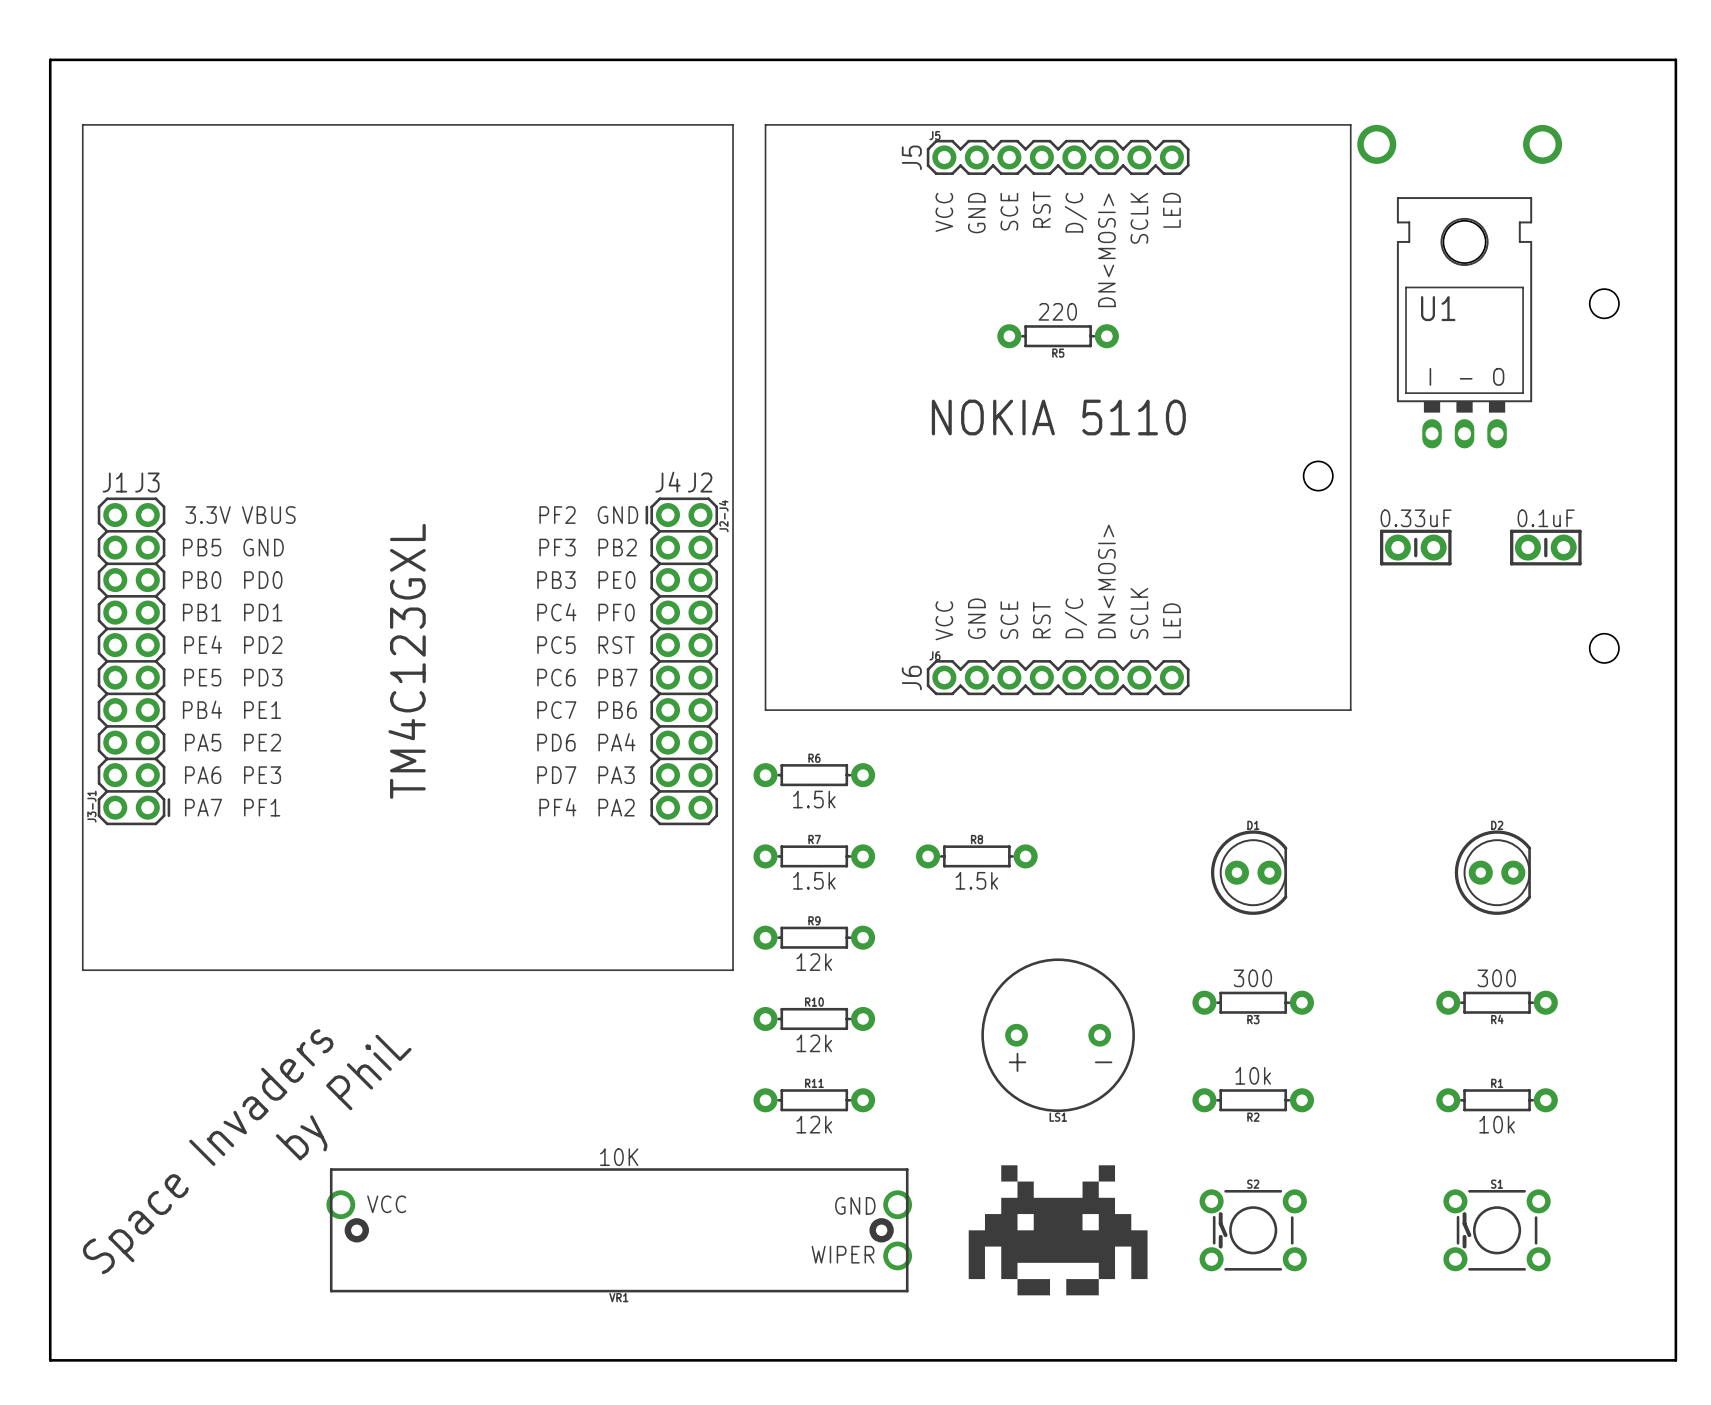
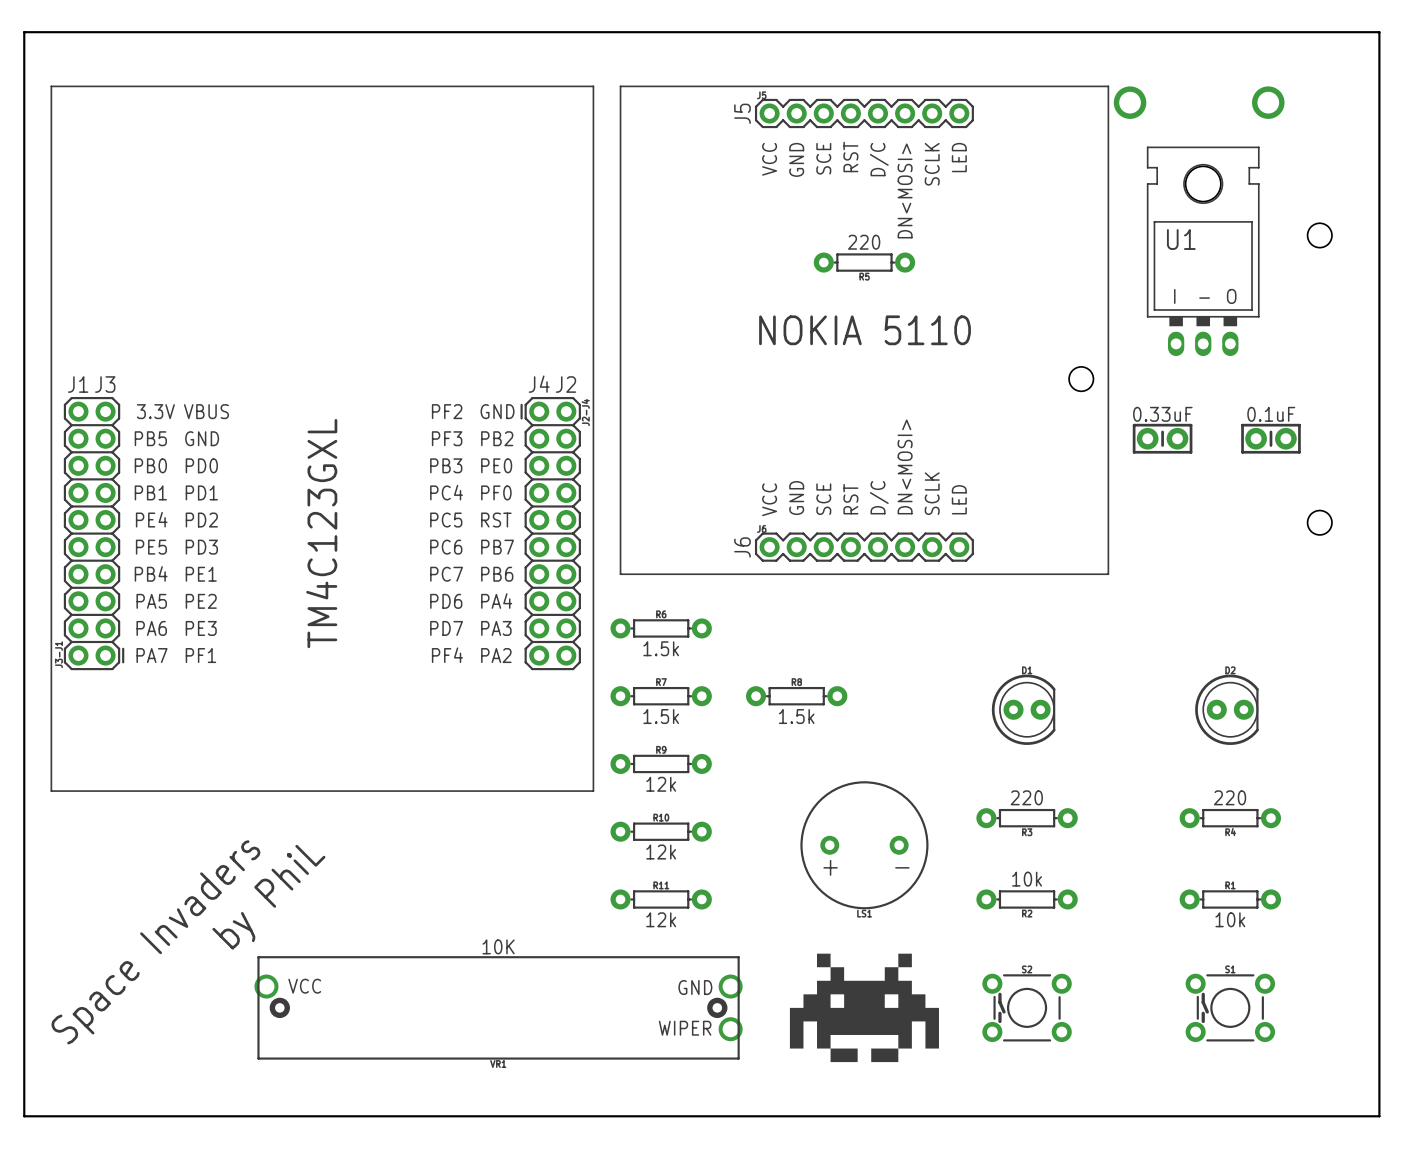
text: 300 (1252, 978) -> 220 (1026, 797)
text: 300 (1496, 978) -> 220 (1230, 797)

